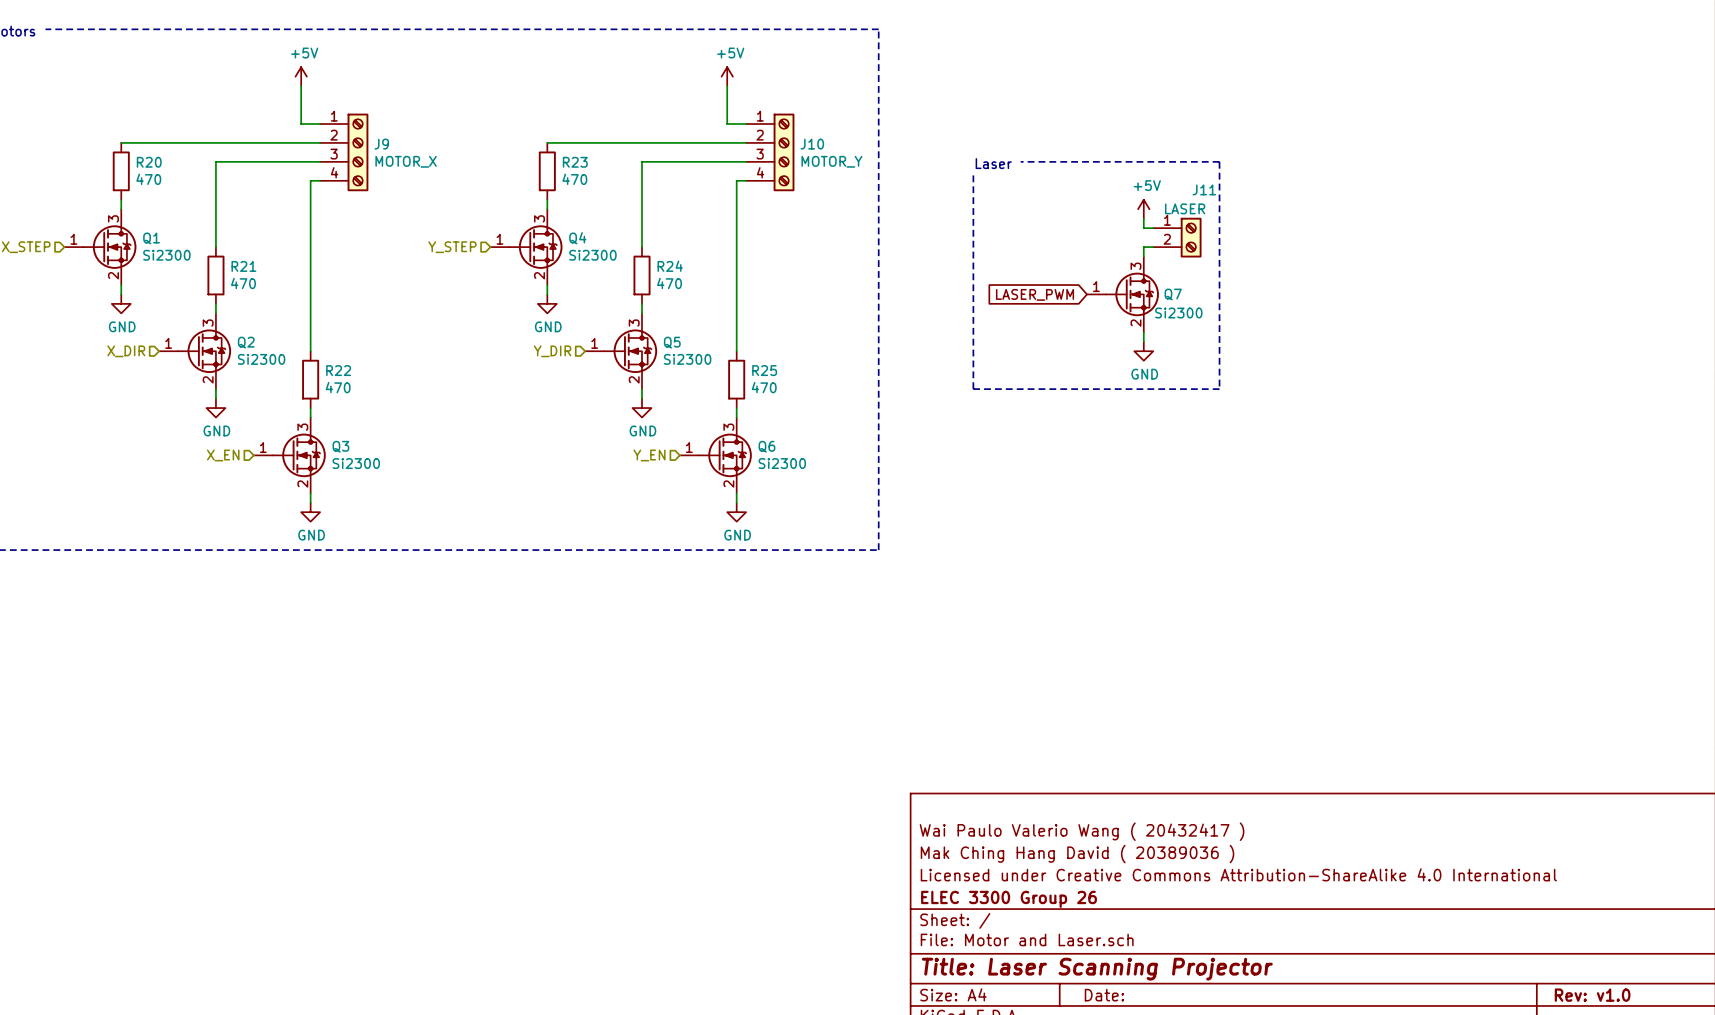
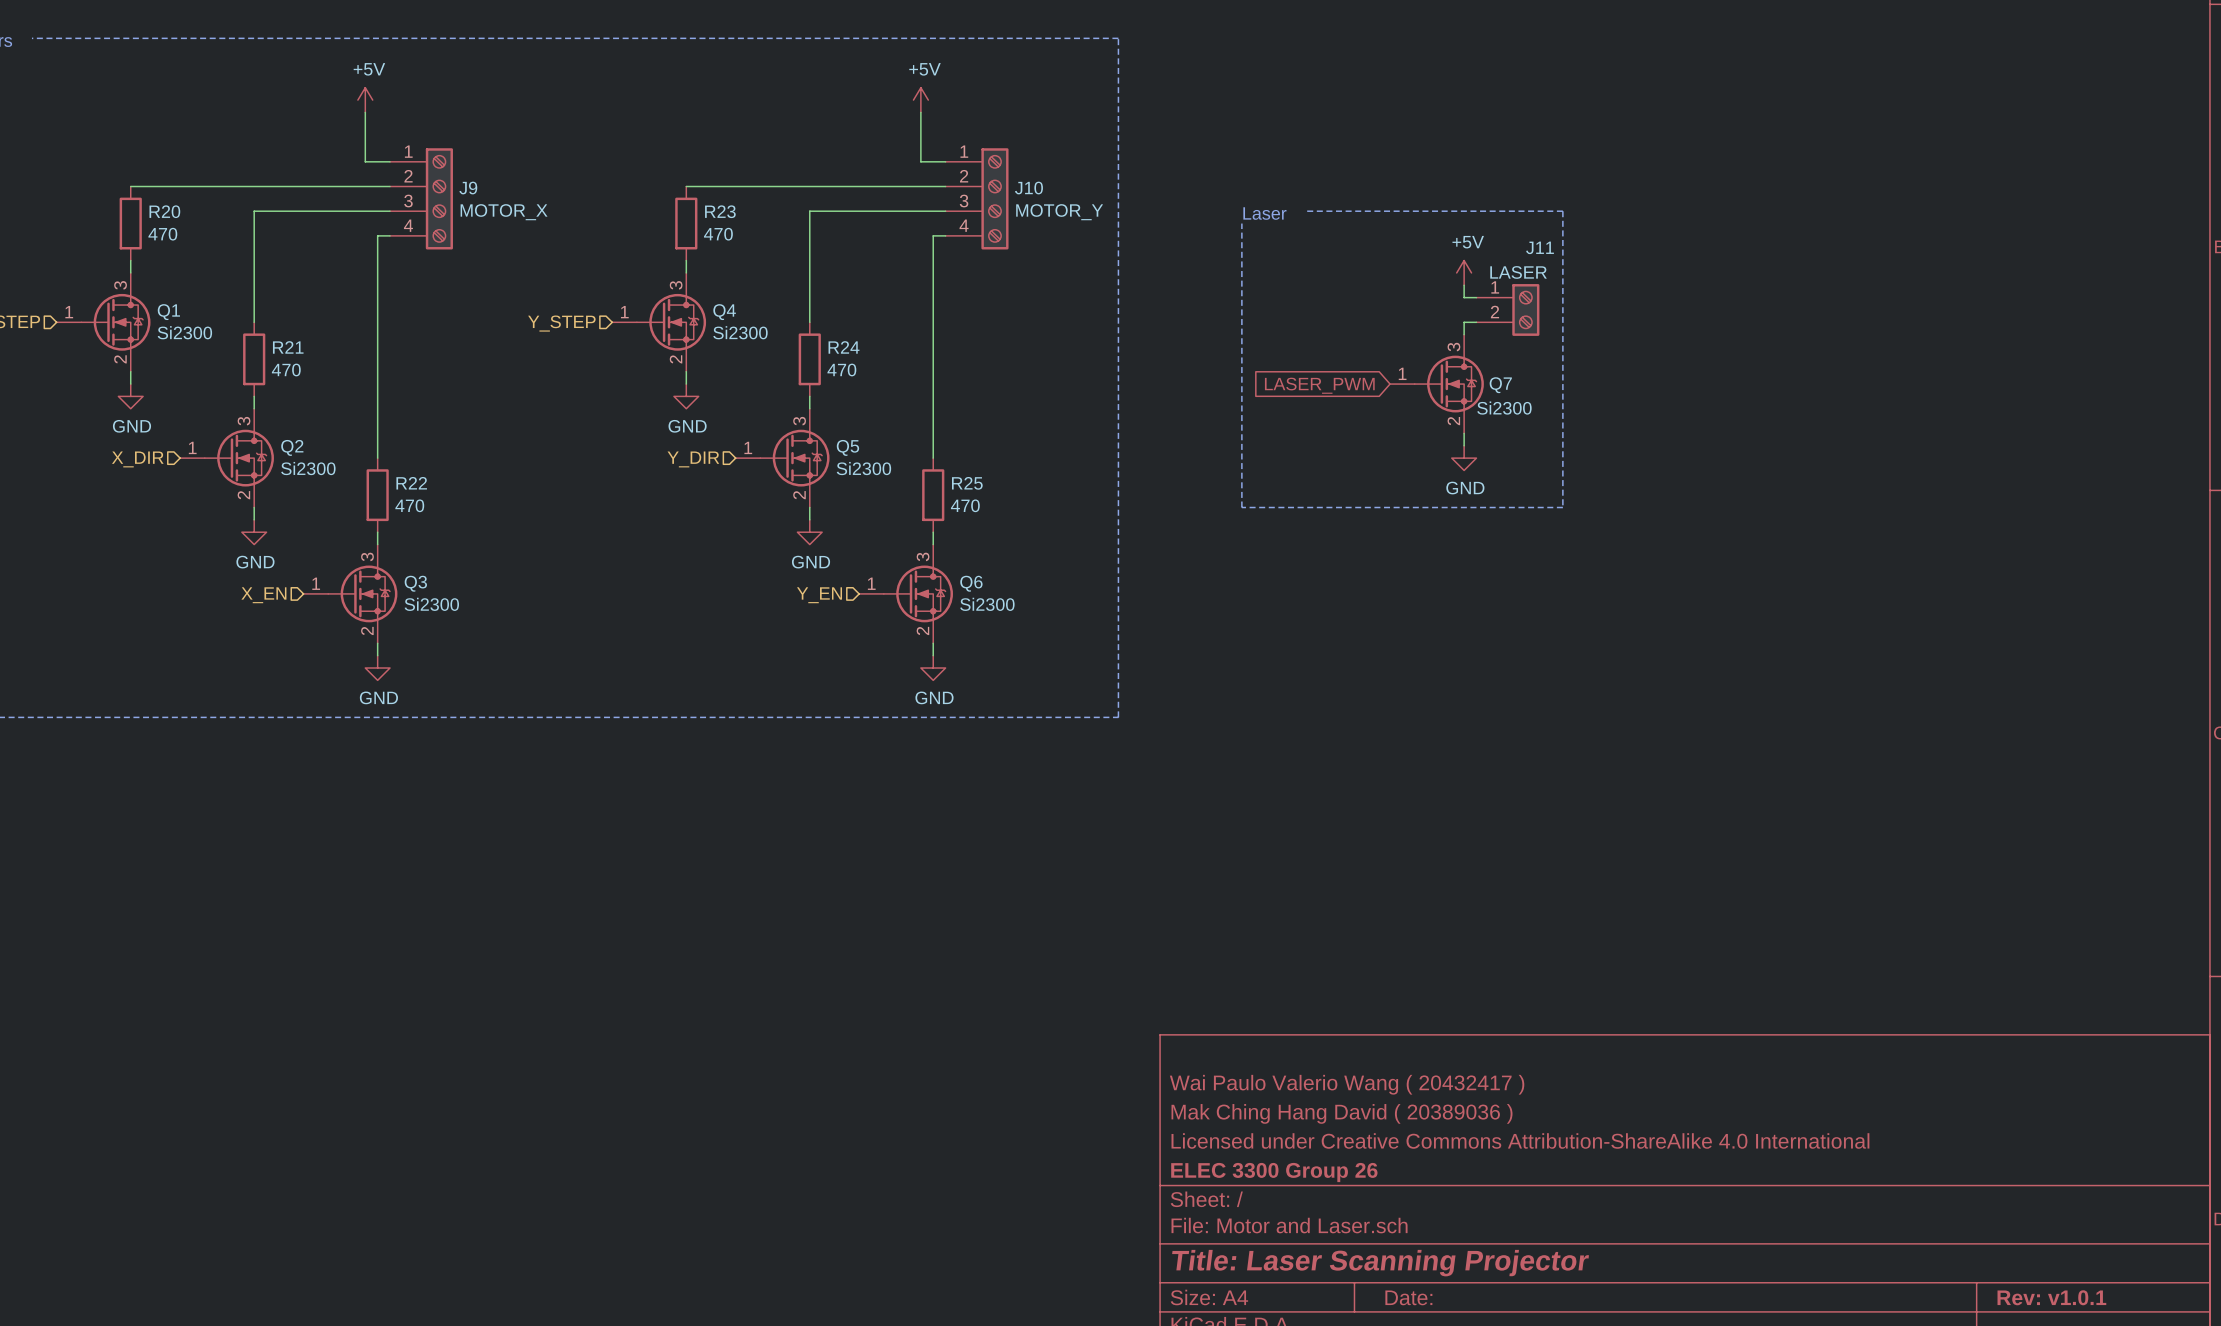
title block: Rev: v1.0 (1592, 995) -> Rev: v1.0.1 (2051, 1297)

